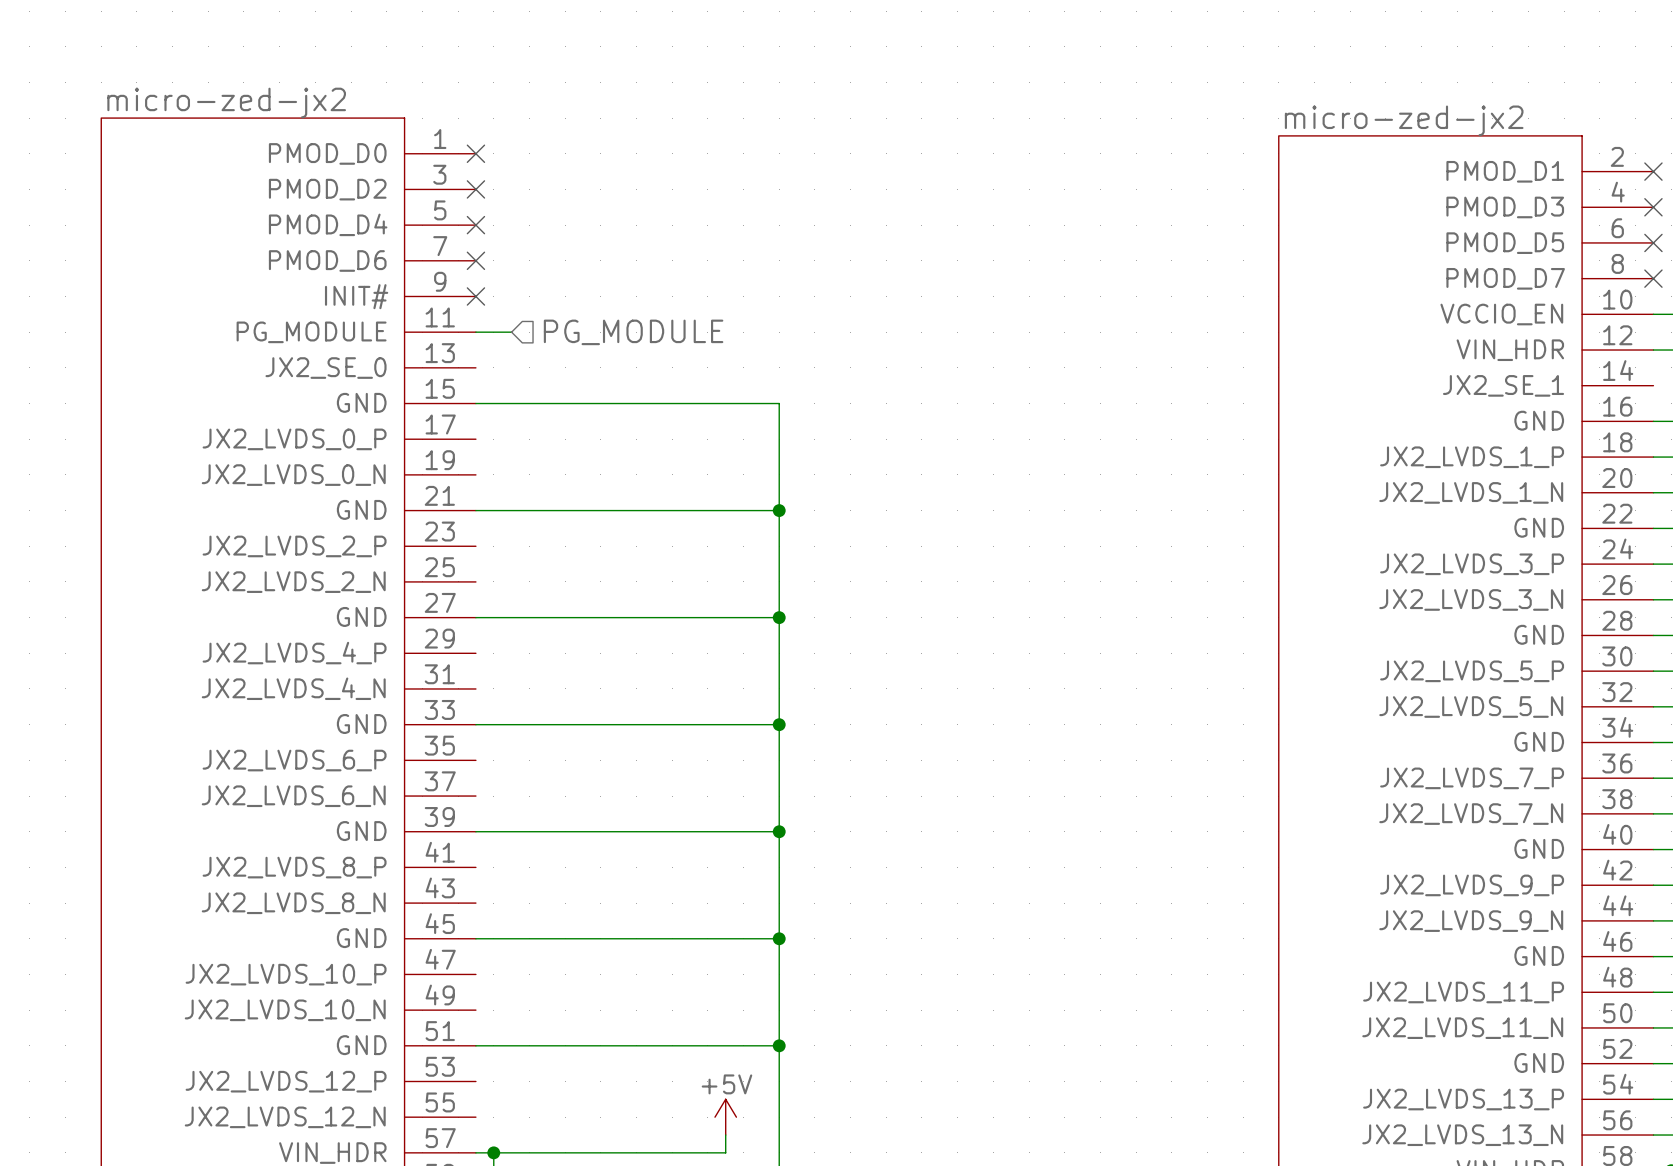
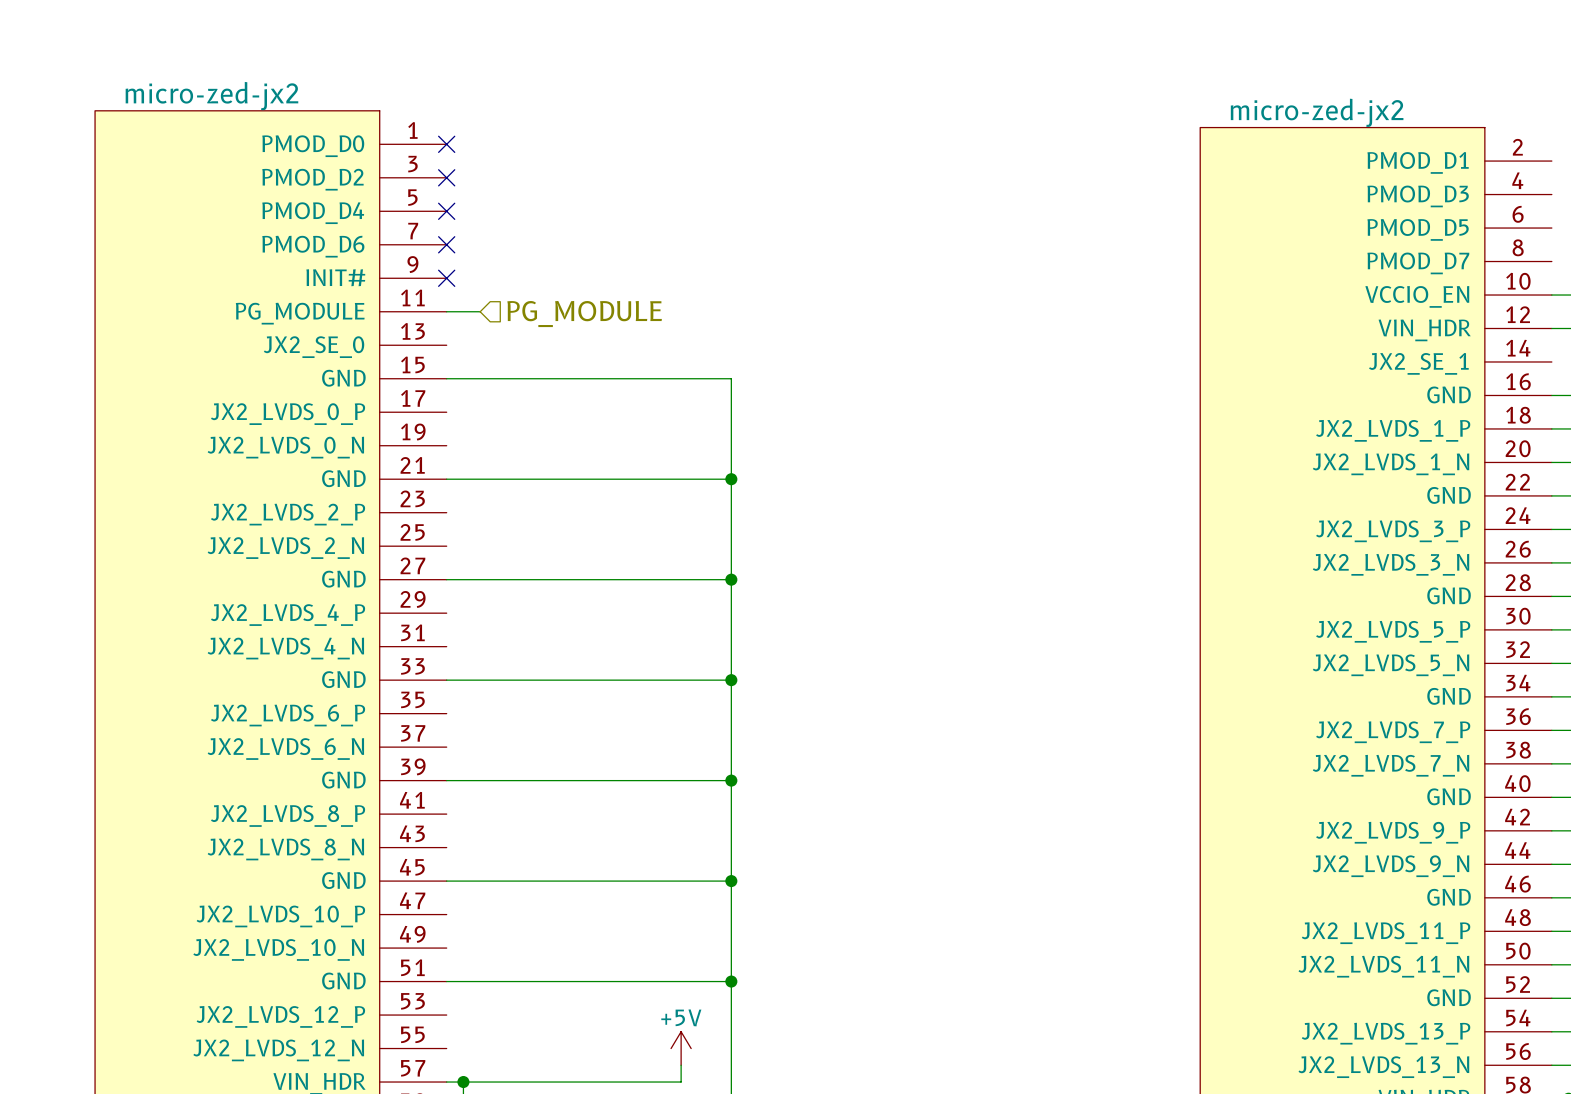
no-connect mark: (1653, 171) -> none
no-connect mark: (1653, 207) -> none
no-connect mark: (1653, 242) -> none
no-connect mark: (1653, 278) -> none

